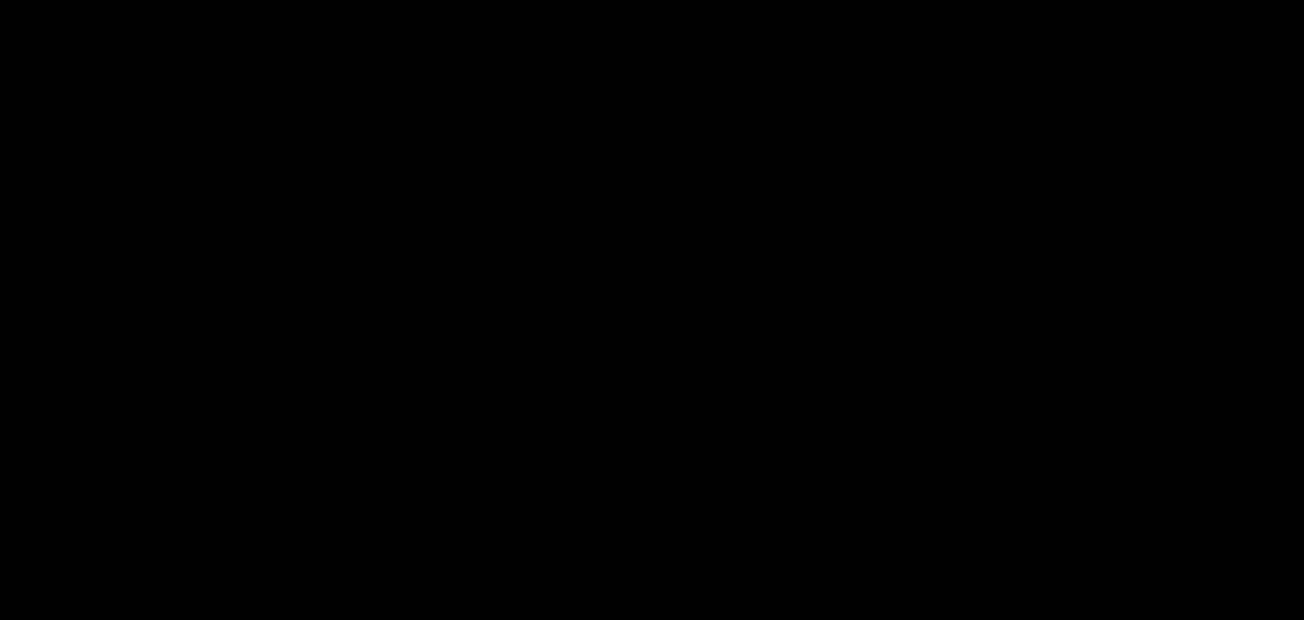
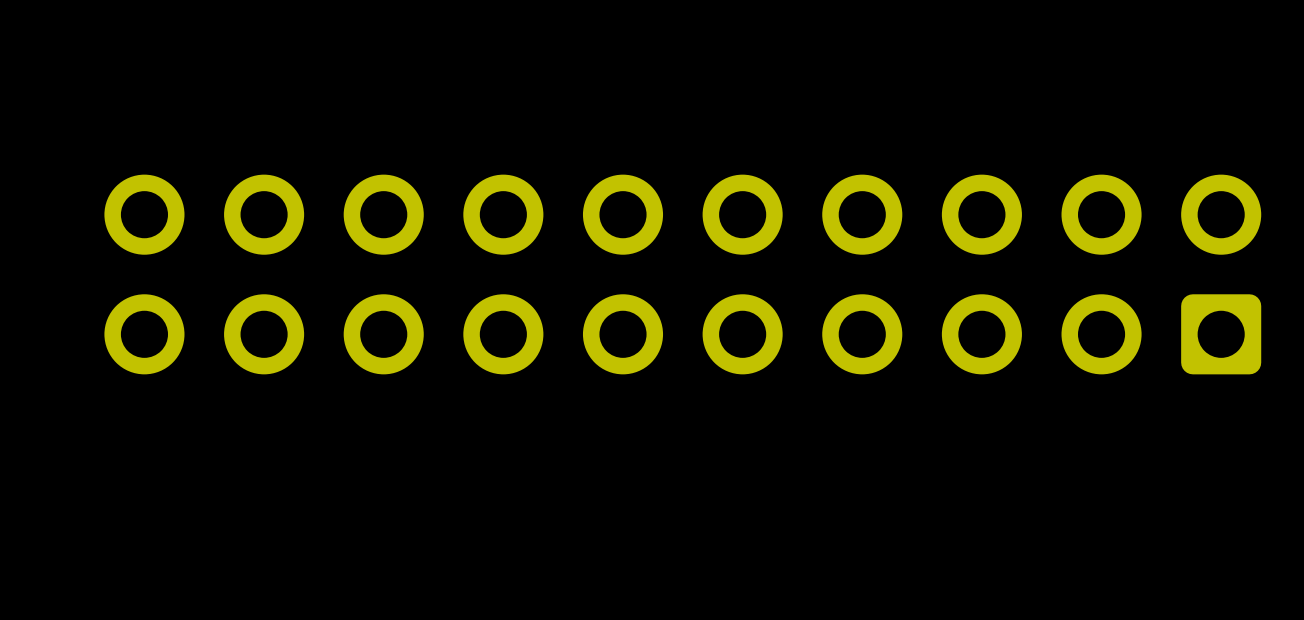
part: none -> (682, 274)

